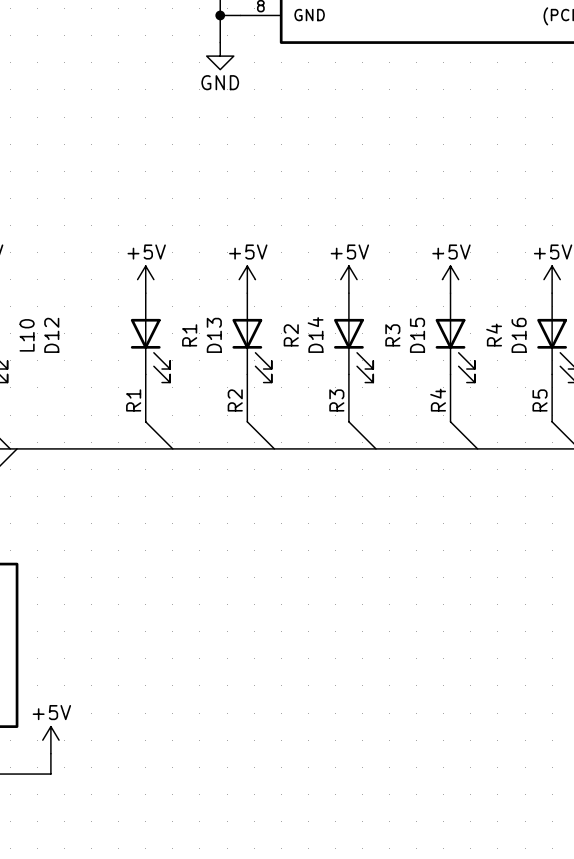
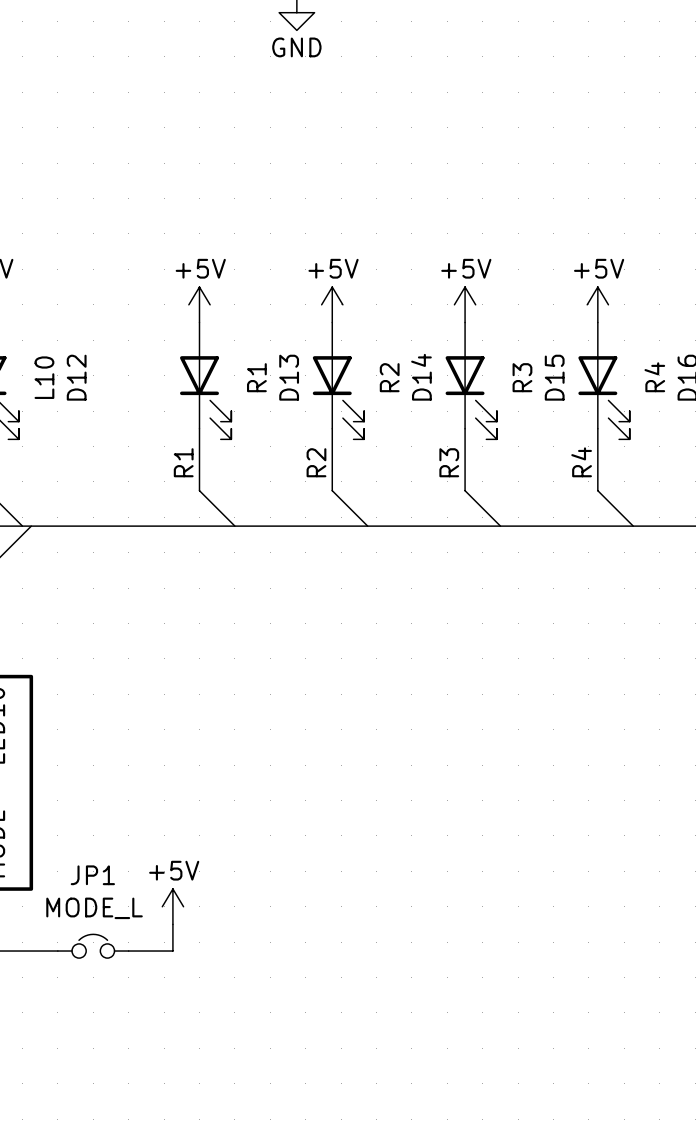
power symbol position: +5V (50, 740) -> +5V (172, 906)
wire: (50, 753) (50, 774) (37, 774) -> none
wire: none -> (172, 924) (172, 951) (128, 951)
JP1: none -> MODE_L (93, 946)

